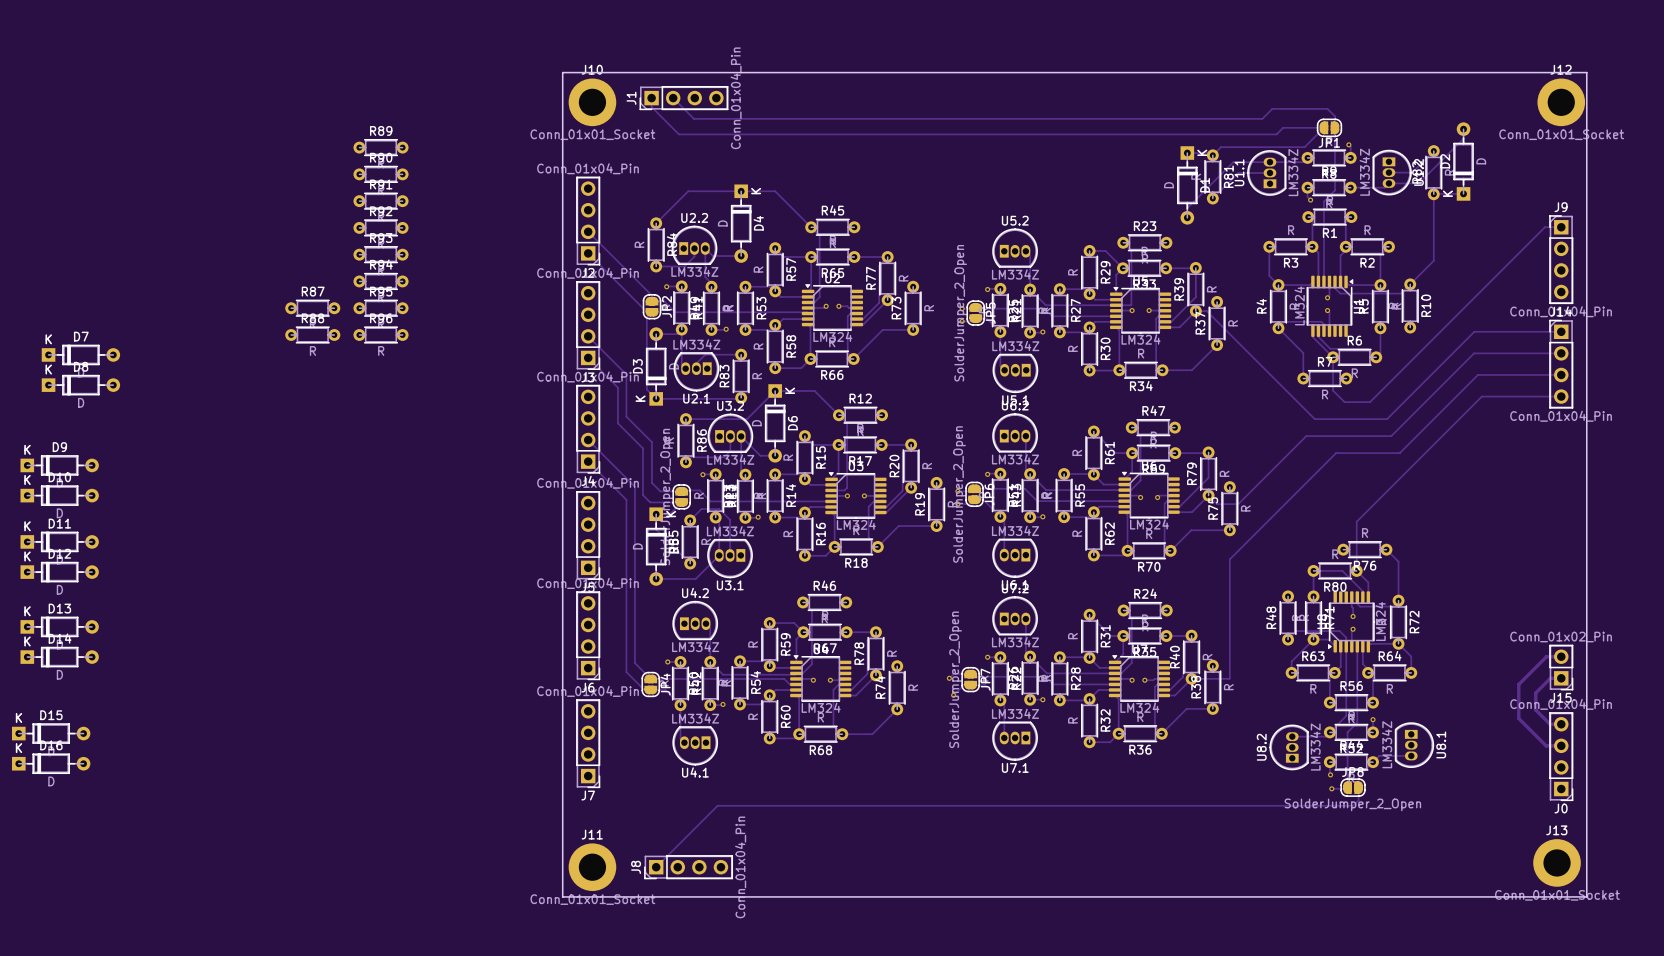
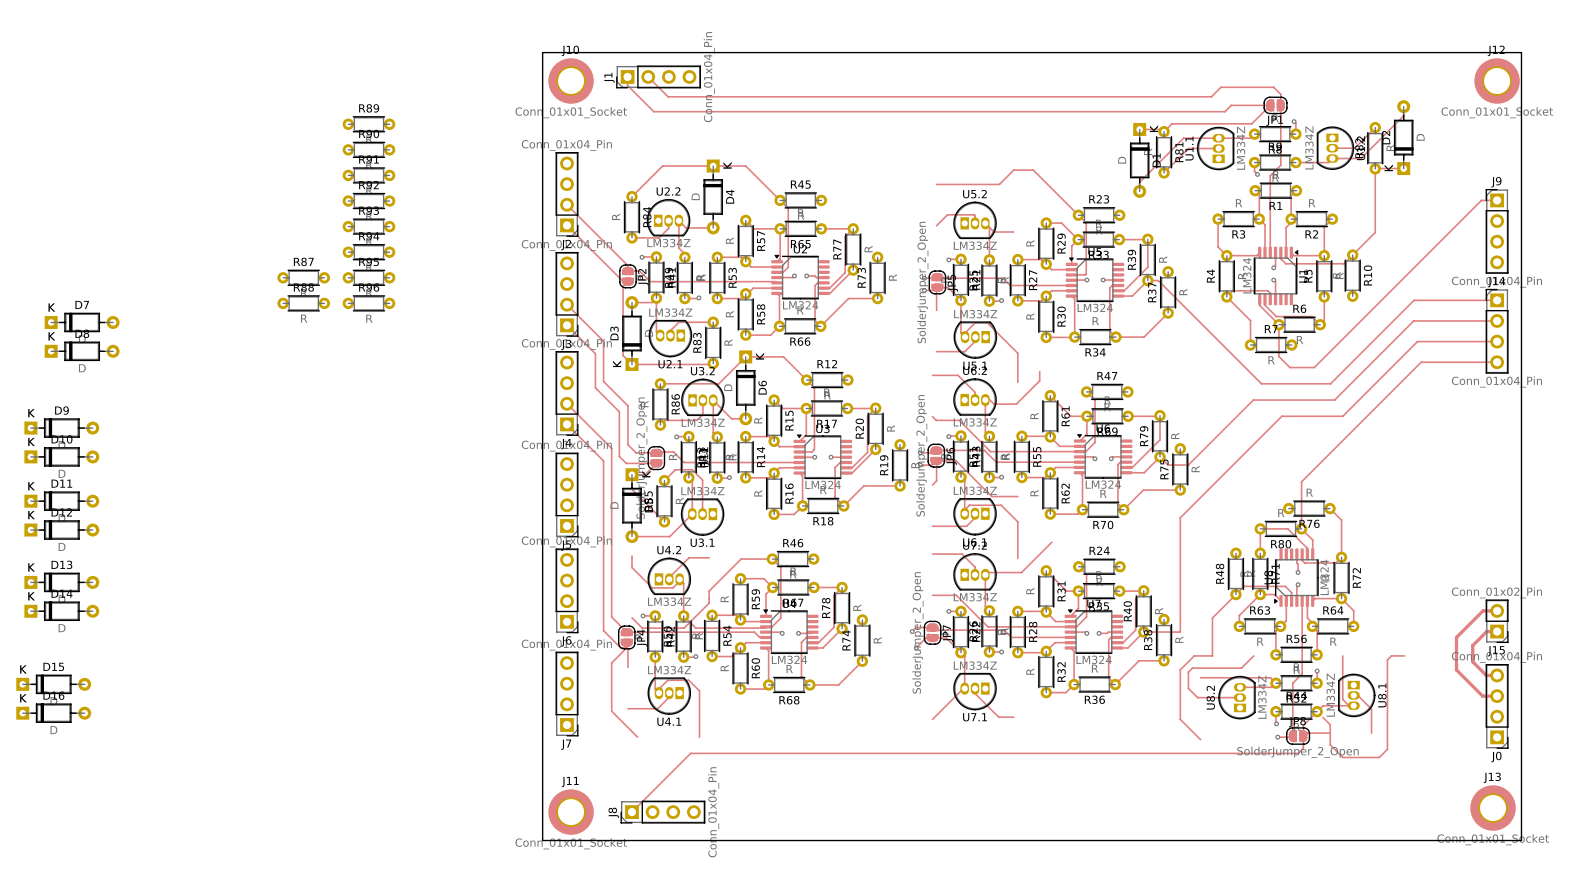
track: none -> (936, 184) (999, 184) (1013, 170) (1033, 170) (1078, 215)
track: none -> (975, 223) (974, 214) (947, 214) (936, 225)
track: none -> (989, 227) (993, 231) (1013, 231)
track: (1030, 286) (1030, 289) (1045, 305) (1116, 305) -> none
track: none -> (936, 288) (936, 310)
track: none -> (965, 337) (965, 333) (975, 322) (987, 322) (1017, 353) (1017, 382)
track: none -> (975, 337) (975, 341) (964, 351) (936, 351)
track: none -> (1039, 371) (1039, 380) (1016, 404) (994, 404) (987, 397)
track: none -> (932, 375) (958, 375) (975, 392) (975, 400)
track: (1030, 474) (1046, 490) -> (932, 416) (936, 420) (959, 420) (990, 451) (1004, 451)
track: none -> (936, 460) (936, 480) (932, 485)
track: (983, 499) (1000, 516) -> (944, 460) (956, 460) (991, 496) (1017, 496)
track: none -> (964, 510) (969, 505) (1001, 505) (1017, 521) (1017, 558)
track: none -> (975, 513) (975, 517) (966, 526) (932, 526)
track: none -> (1051, 542) (1021, 572) (987, 572)
track: none -> (932, 554) (961, 554) (975, 567) (975, 574)
track: none -> (631, 555) (631, 567) (652, 587) (672, 587) (679, 579)
track: none -> (709, 557) (689, 557) (669, 579)
track: none -> (772, 559) (741, 559) (709, 591) (709, 603) (684, 628) (642, 628) (631, 617)
track: none -> (1235, 594) (1212, 618) (1212, 655) (1194, 655) (1180, 669) (1180, 719) (1200, 739)
track: (1346, 646) (1346, 715) (1329, 732) -> (1200, 677) (1270, 677) (1275, 683)
track: (1030, 656) (1046, 673) -> (932, 595) (956, 595) (987, 626) (1005, 626)
track: (626, 672) (644, 690) (665, 690) (680, 705) -> (603, 625) (603, 630) (620, 647) (626, 647)
track: none -> (626, 647) (627, 667)
track: none -> (626, 647) (611, 662) (611, 711) (637, 737)
track: none -> (1253, 655) (1241, 668) (1192, 668) (1188, 672) (1188, 688) (1197, 697) (1240, 697)
track: none -> (1342, 655) (1342, 699) (1349, 705)
track: none -> (1404, 655) (1391, 655) (1387, 659) (1387, 749) (1379, 757) (1342, 757) (1330, 744) (1330, 724) (1322, 717)
track: none -> (975, 688) (975, 693) (998, 717) (1013, 717)
track: none -> (962, 690) (932, 719)
track: none -> (658, 693) (658, 689) (667, 680) (688, 680) (699, 690) (699, 737)
track: none -> (669, 693) (669, 697) (657, 708) (627, 708)
track: none -> (1353, 695) (1357, 695) (1371, 709) (1371, 733)
track: none -> (1330, 733) (1307, 733) (1304, 736)

